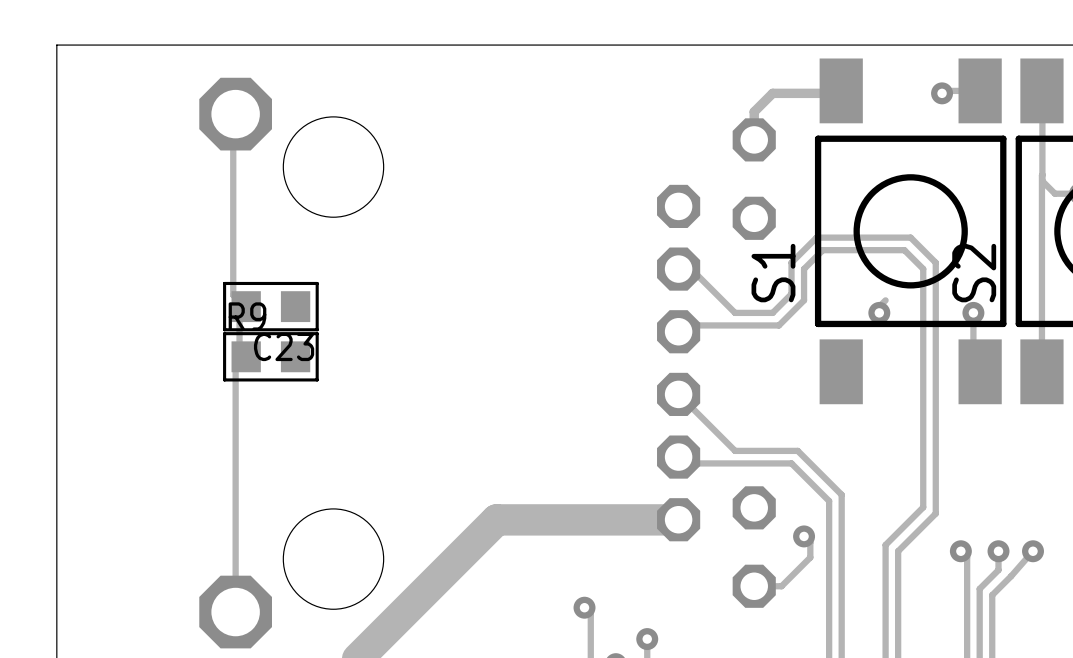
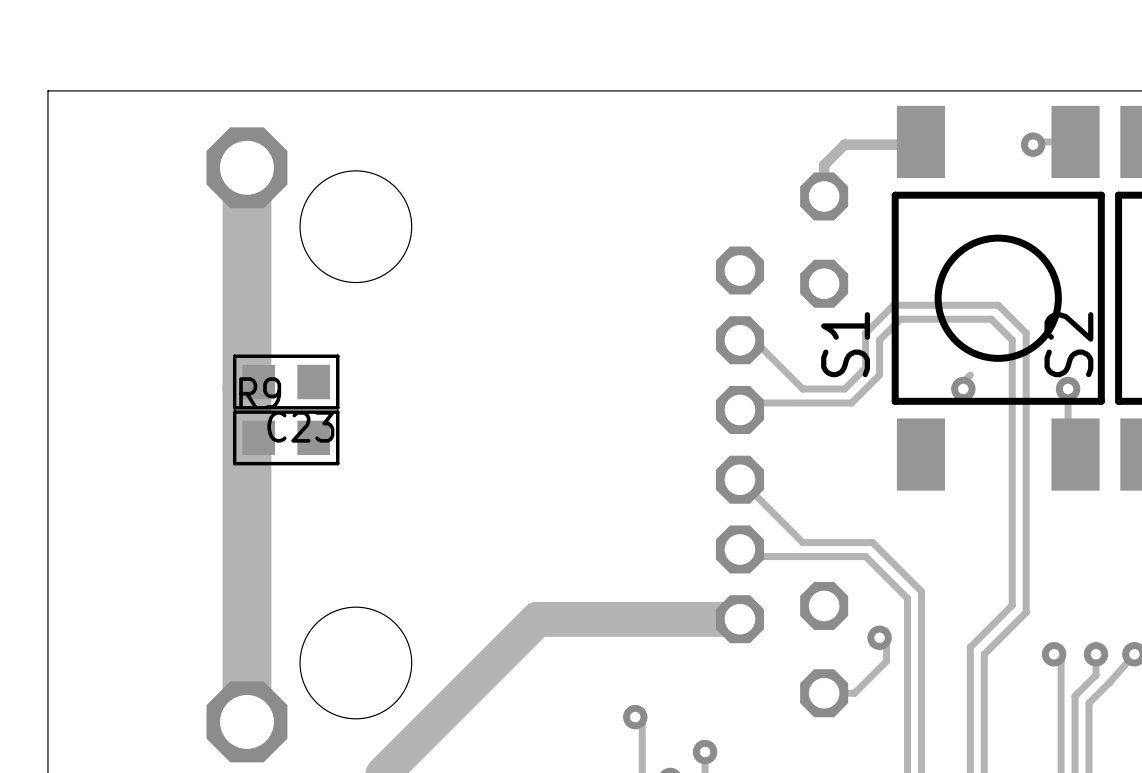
track: (235, 134) (233, 137) (233, 295) (246, 306) -> (246, 190) (246, 444)
track width: thin (235, 362) (235, 612) -> thick (246, 444) (246, 721)

